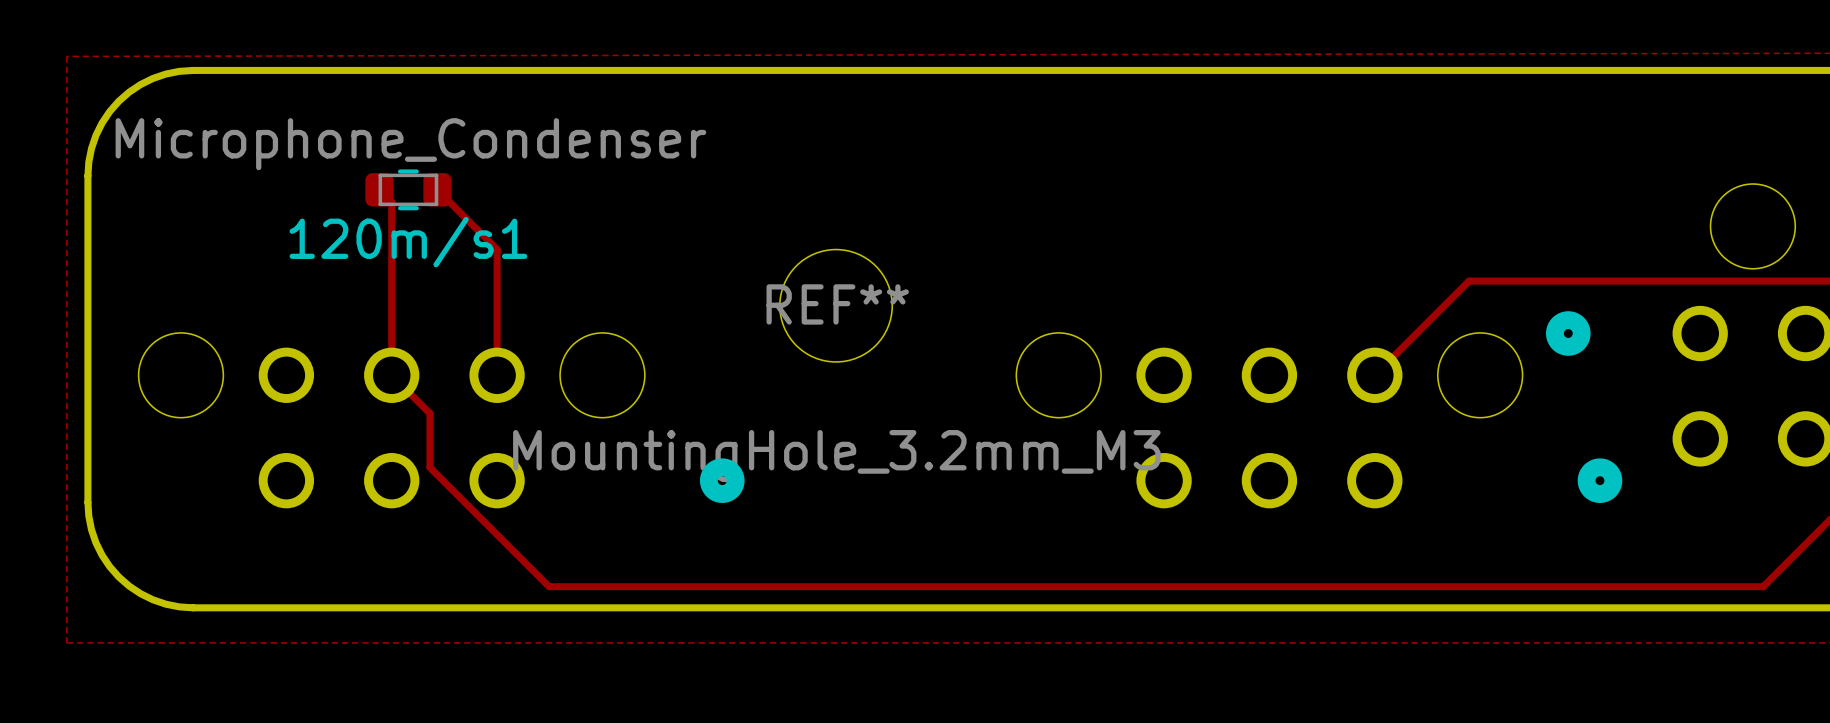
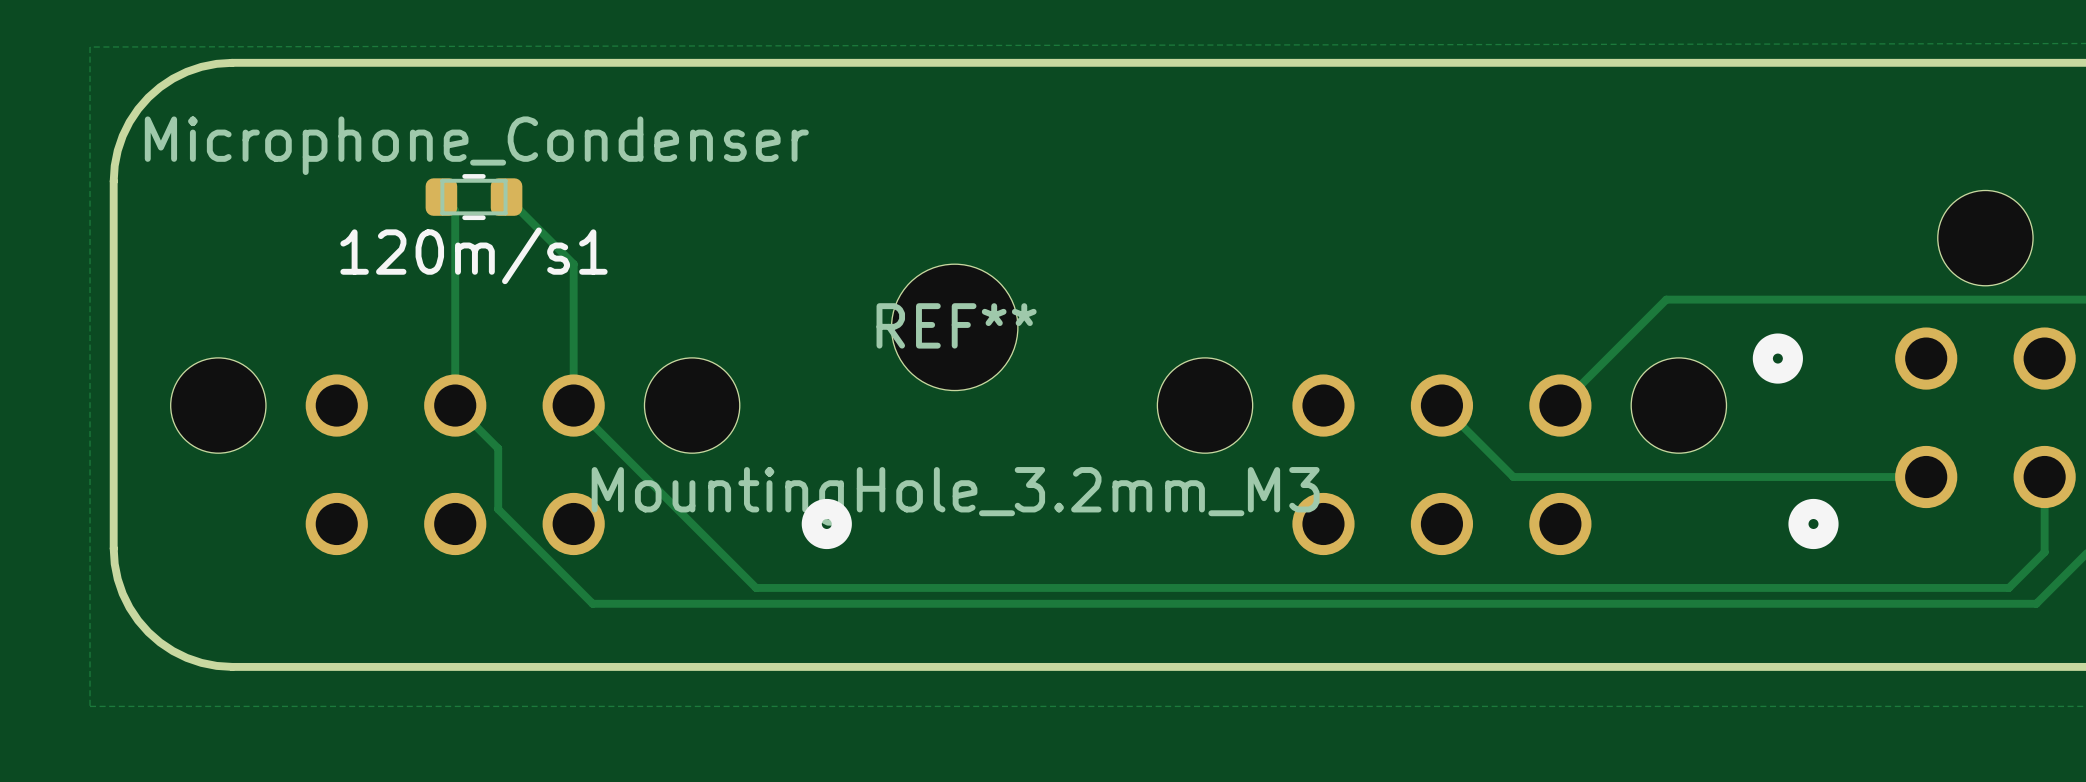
track: none -> (573, 405) (756, 587) (2008, 587) (2044, 552) (2044, 477)
track: none -> (1441, 405) (1513, 477) (1926, 477)
track: (514, 551) (549, 586) (1763, 586) (1798, 551) -> (592, 603) (2036, 603)

